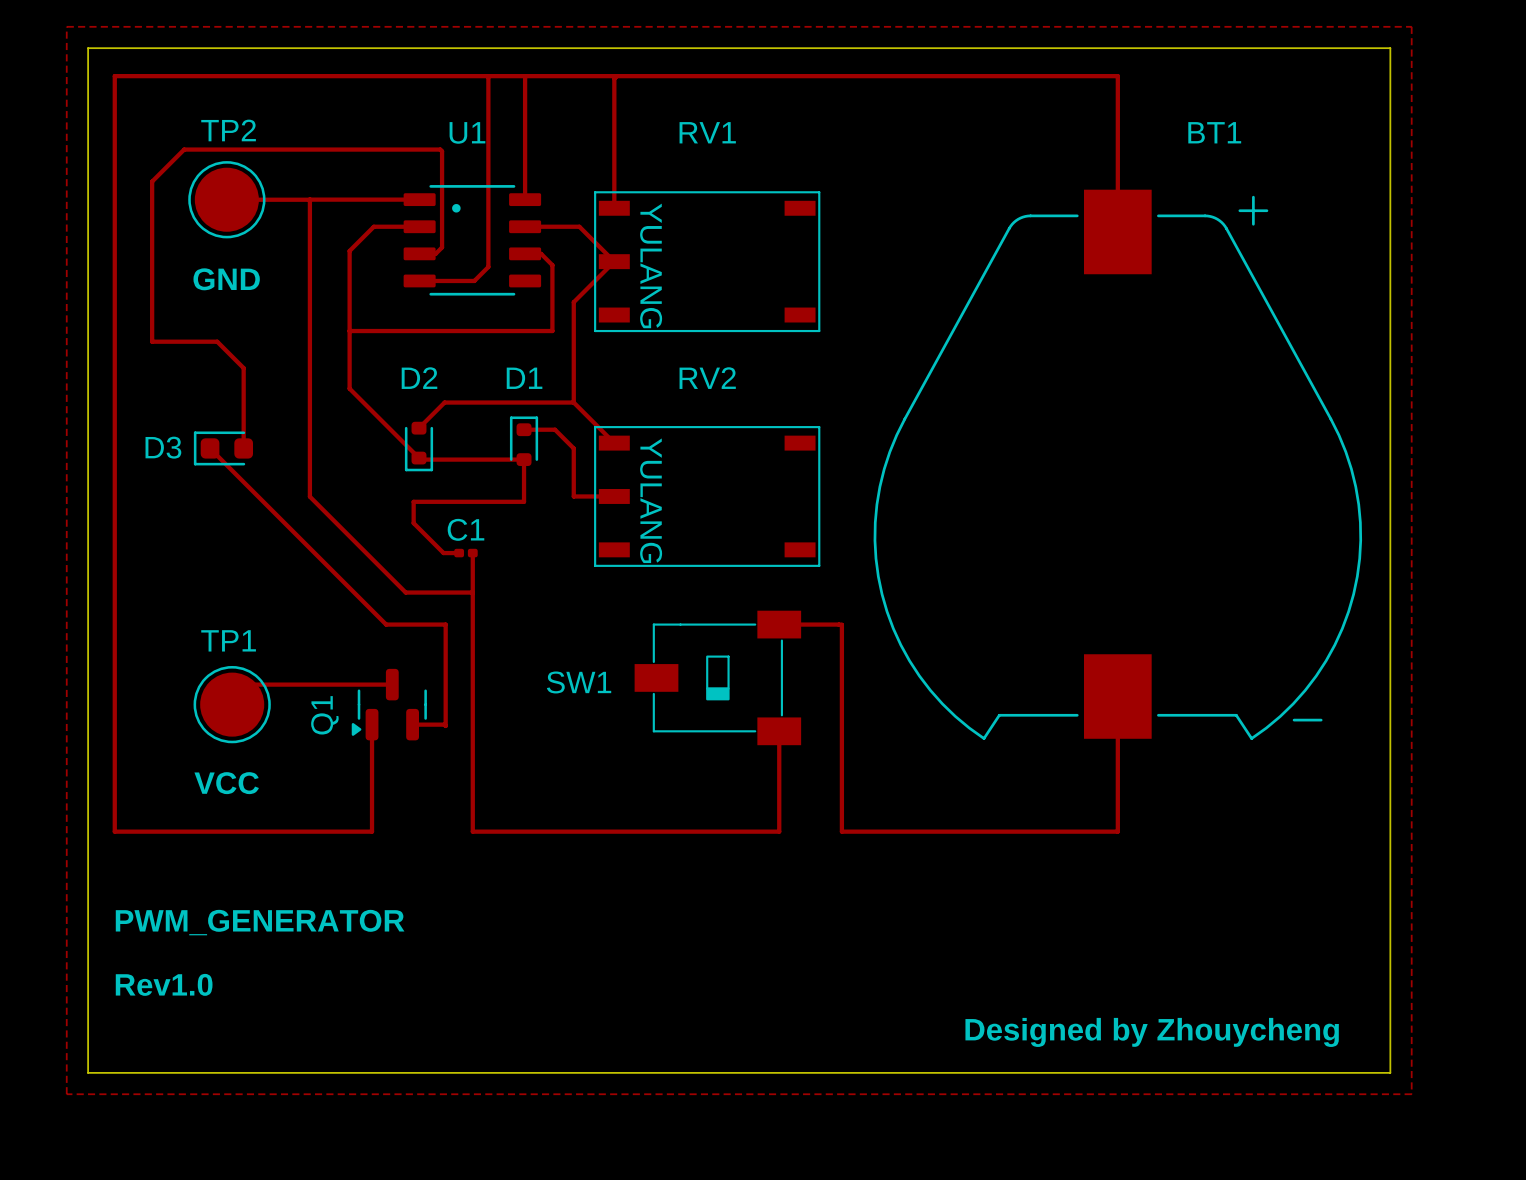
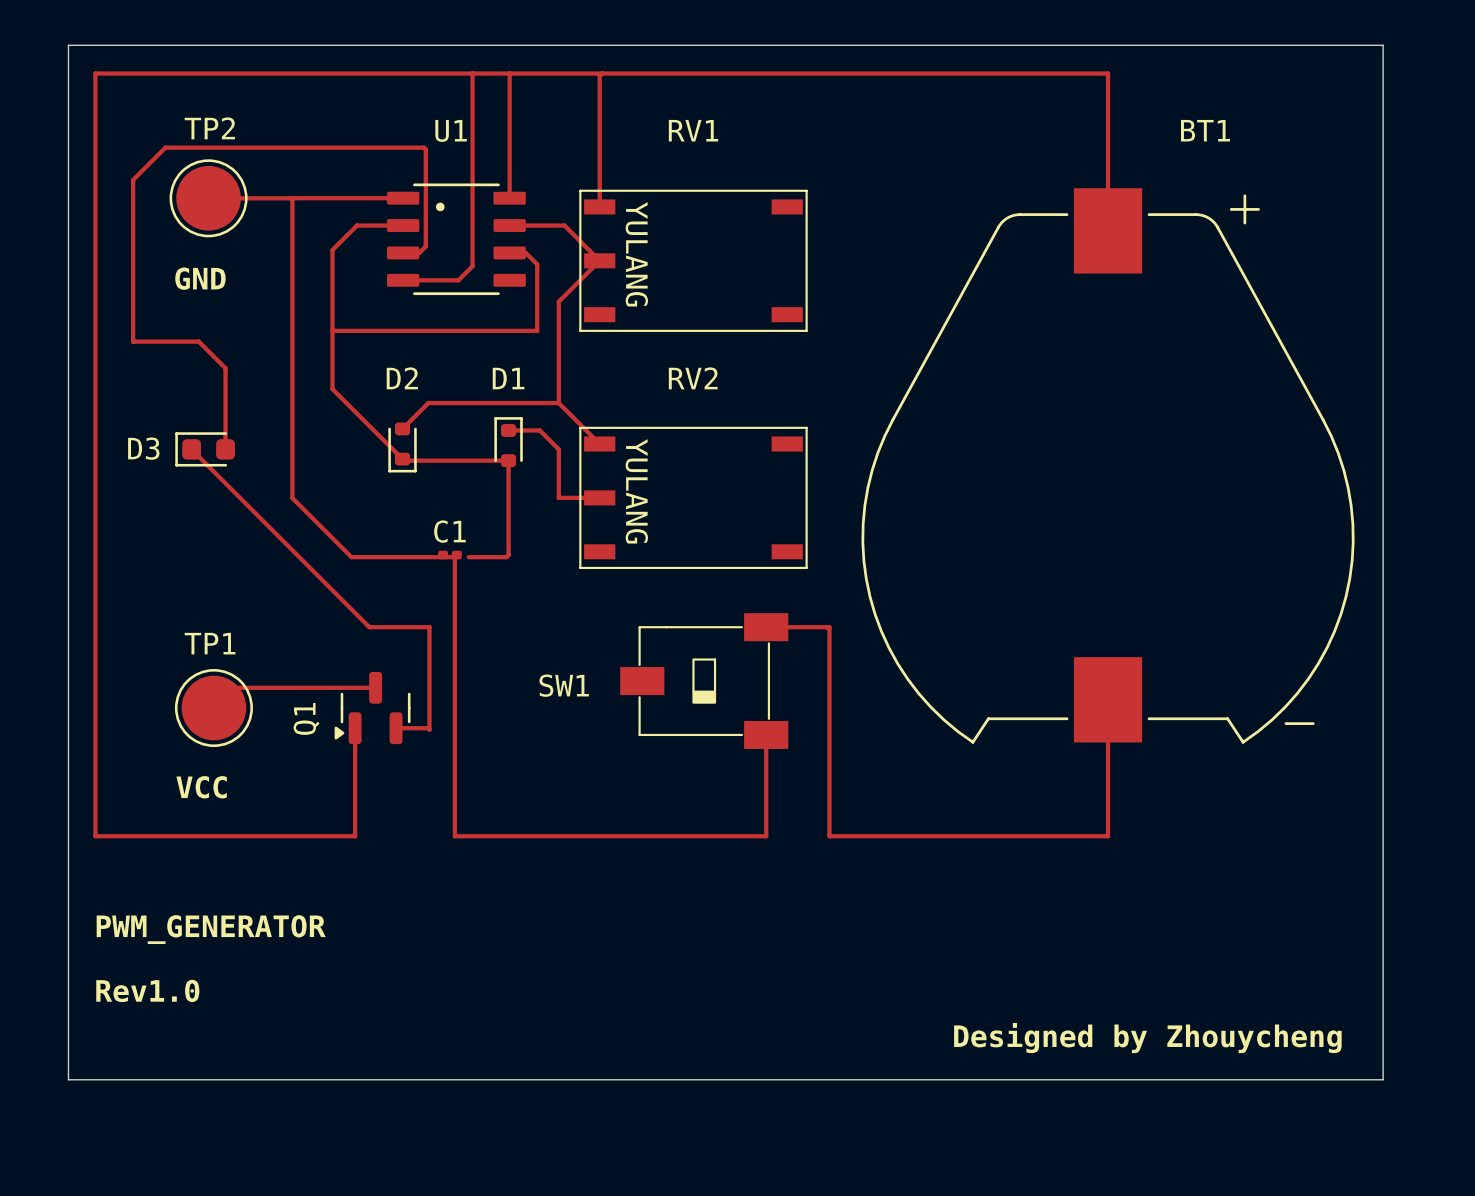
top zone outline: (66, 26) (1411, 26) (1411, 1094) (66, 1094) (66, 26) -> none
top track: (524, 501) (413, 501) (413, 523) (443, 553) (459, 553) -> (508, 503) (508, 555) (506, 557) (468, 557)
top track: (472, 553) (472, 831) -> (351, 557) (454, 557) (454, 836) (456, 836)
top track: (368, 555) (405, 592) (472, 592) -> none

